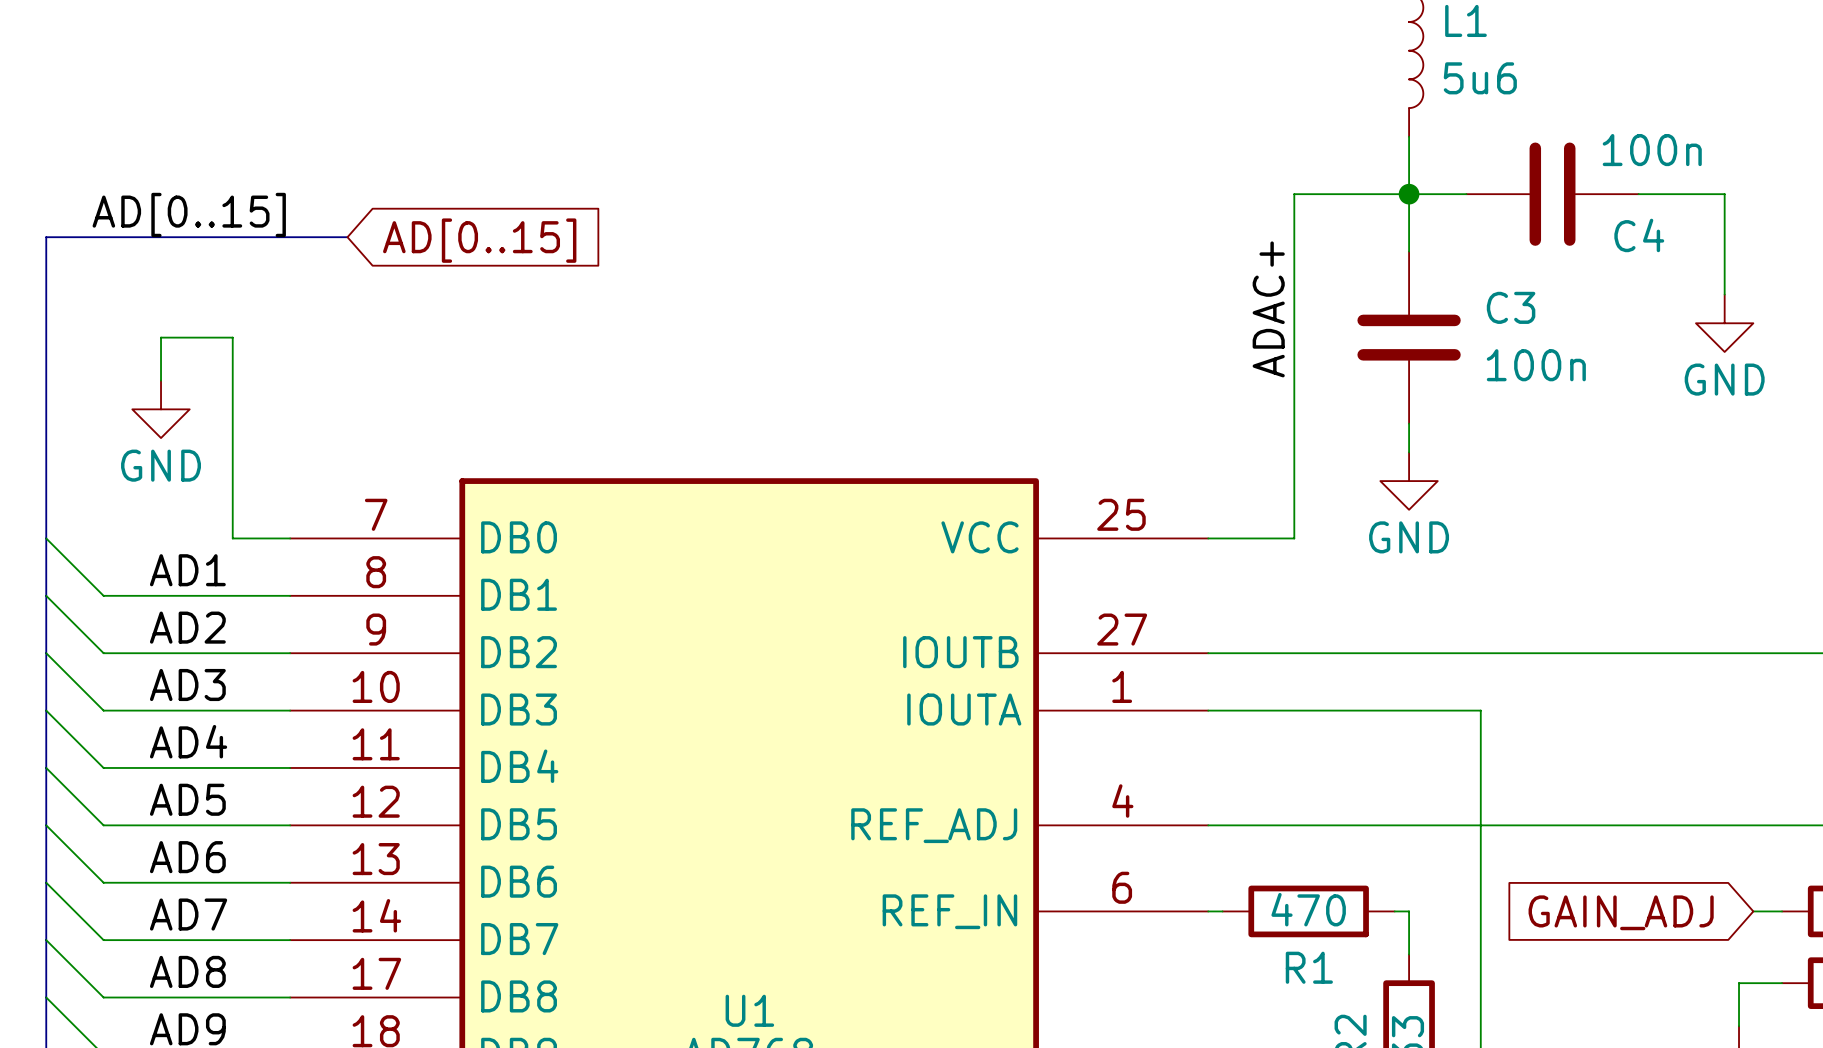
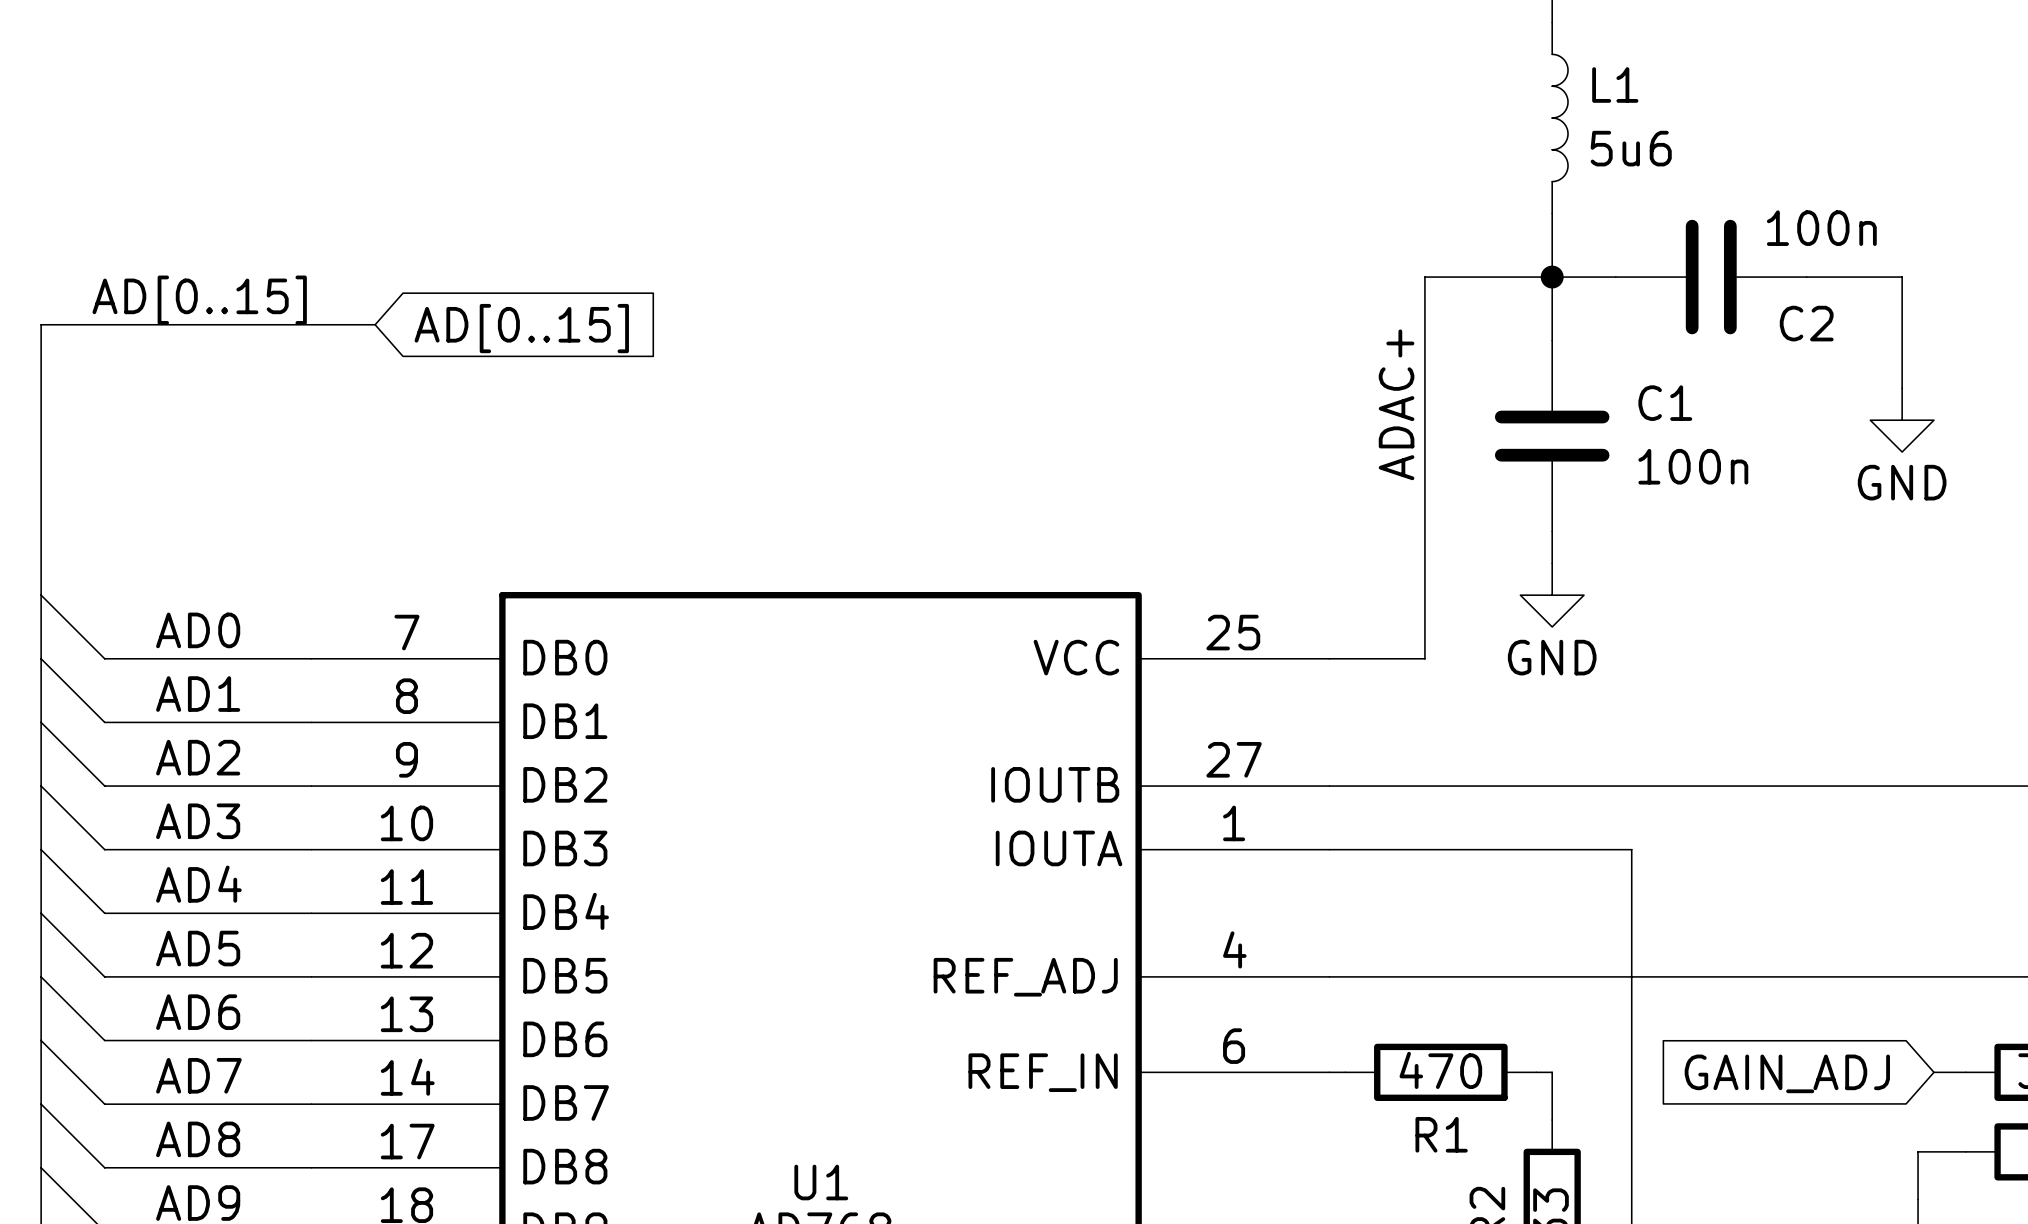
C4 name: C4 (1639, 235) -> C2 (1806, 323)
C3 name: C3 (1511, 307) -> C1 (1665, 403)
wire: (161, 380) (161, 337) (232, 337) (232, 538) -> (41, 595) (104, 658) (247, 658)
power symbol: GND (161, 409) -> none
label: none -> AD0 (198, 630)

